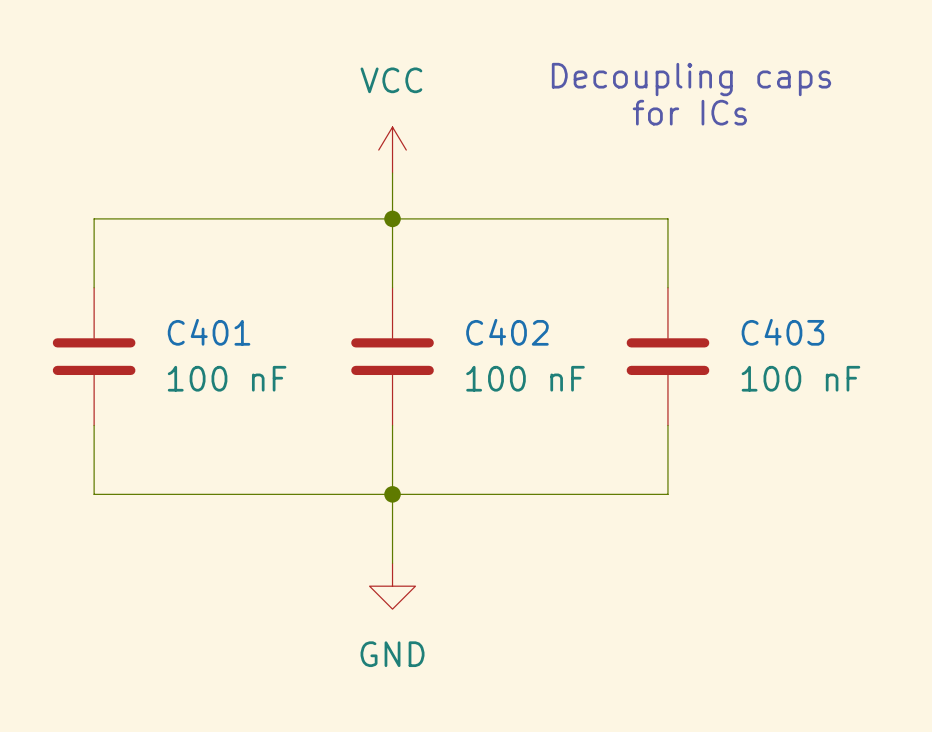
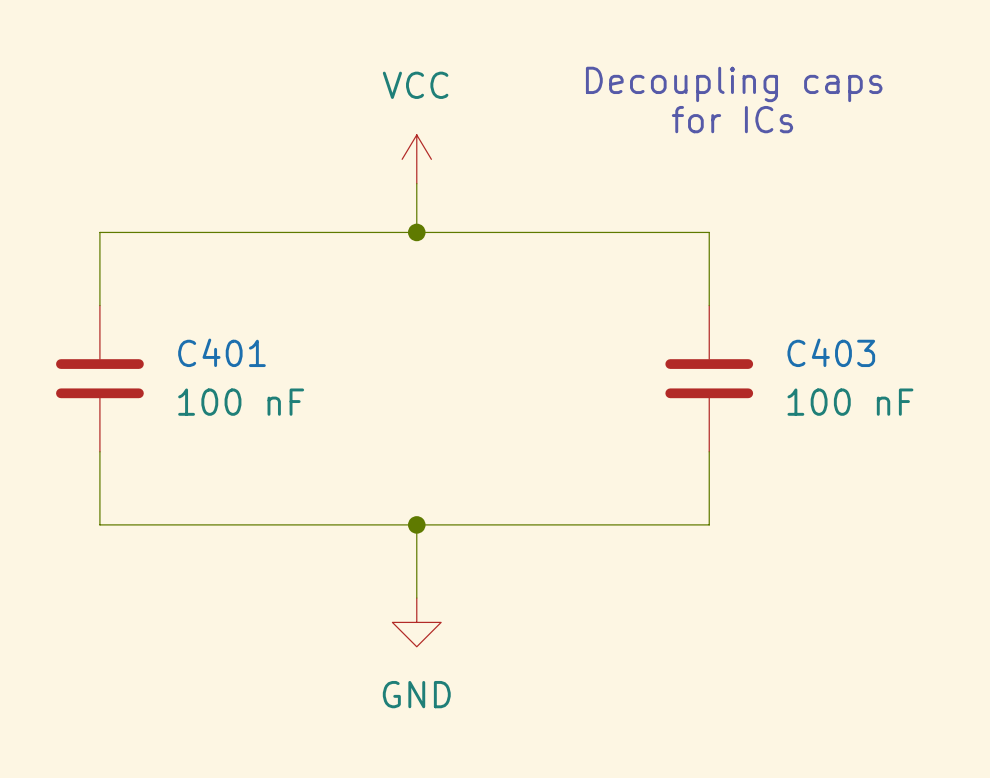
wire: (392, 218) (392, 287) -> none
C402: 100 nF (392, 356) -> none
wire: (392, 425) (392, 494) -> none

